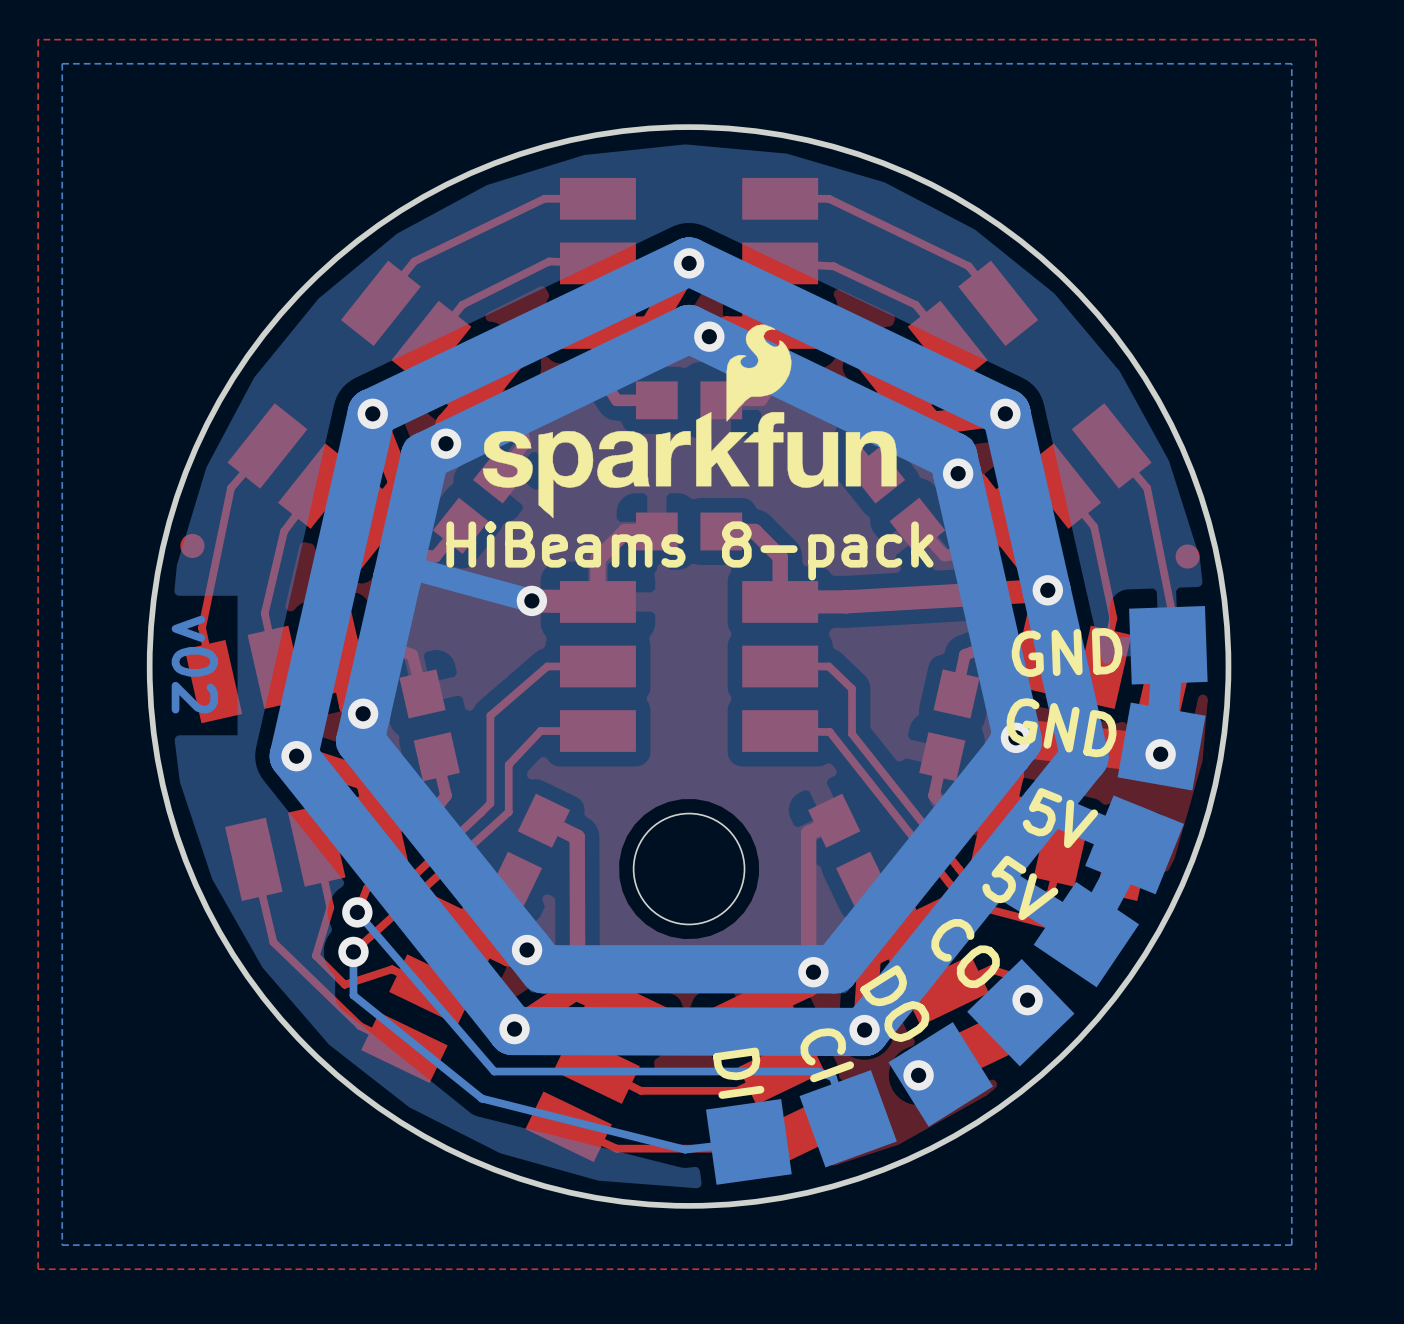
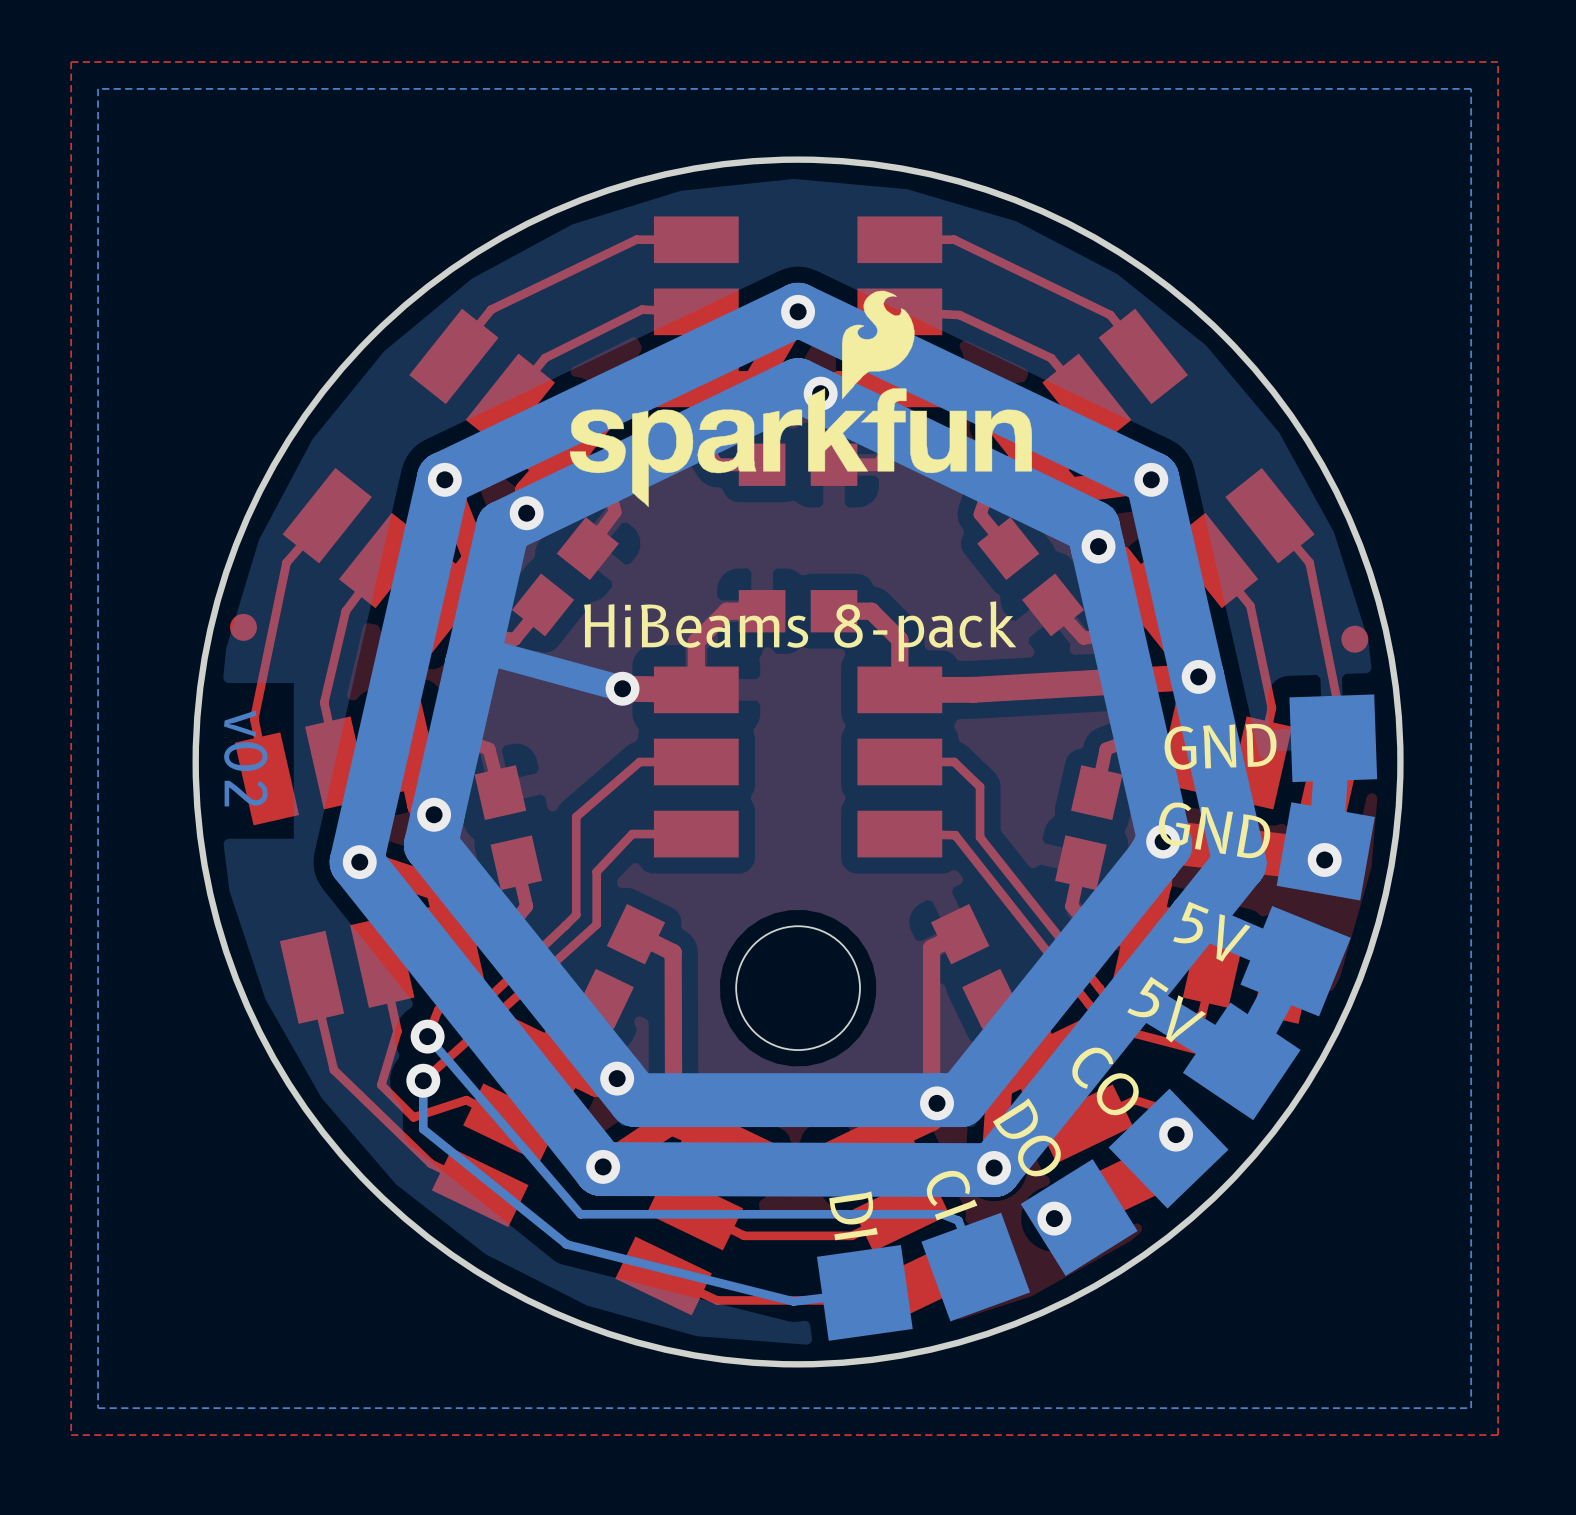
drawing position: (689, 421) -> (800, 398)

